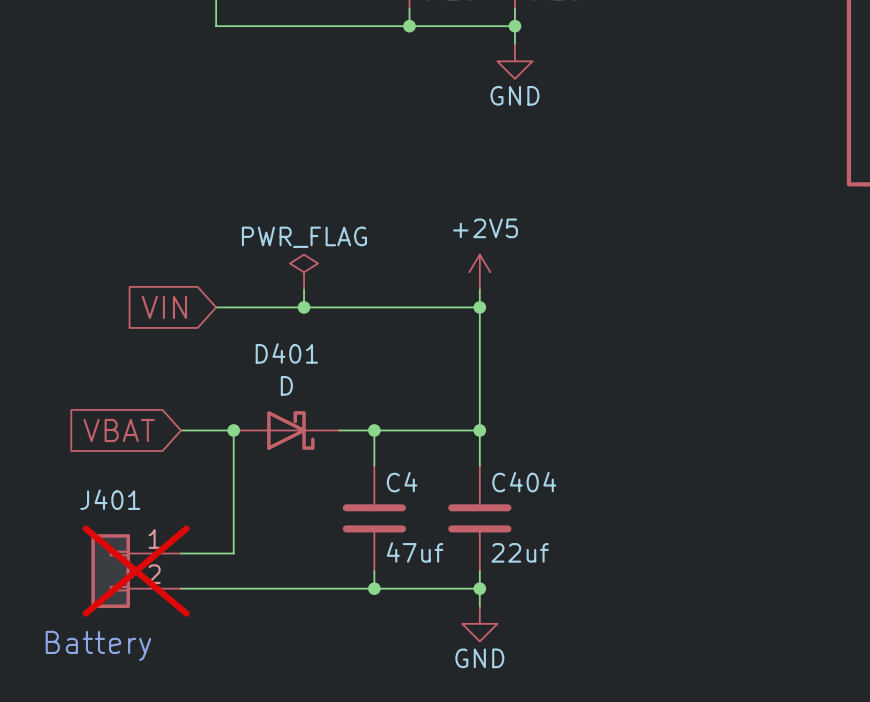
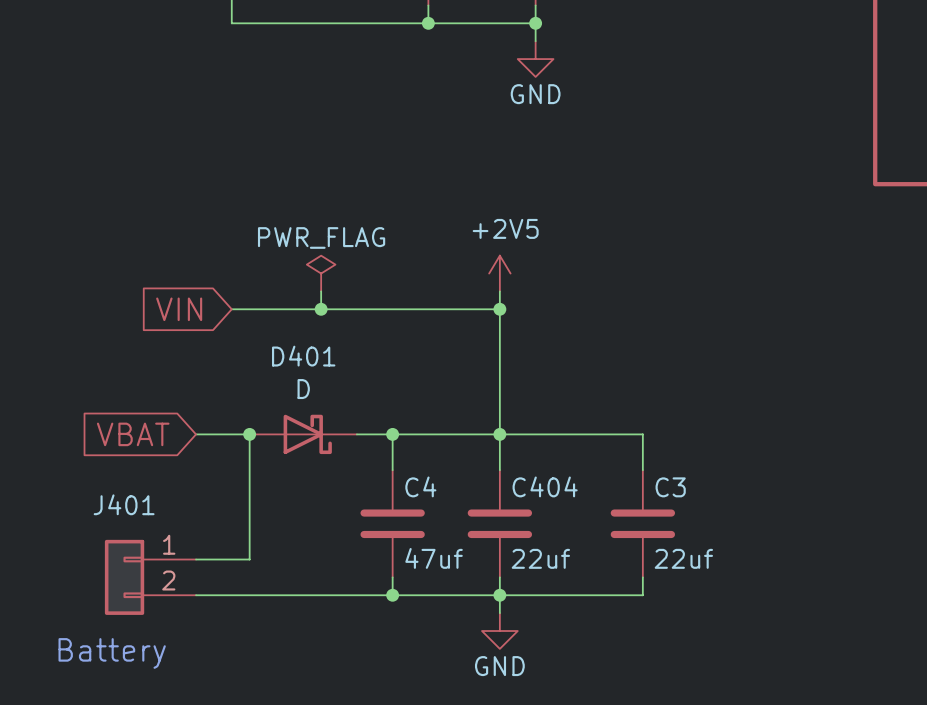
wire: none -> (499, 434) (642, 434) (642, 470)
C3: none -> 22uf (642, 523)
J401 do-not-place cross: (136, 571) -> none
wire: none -> (642, 577) (642, 595) (499, 595)

